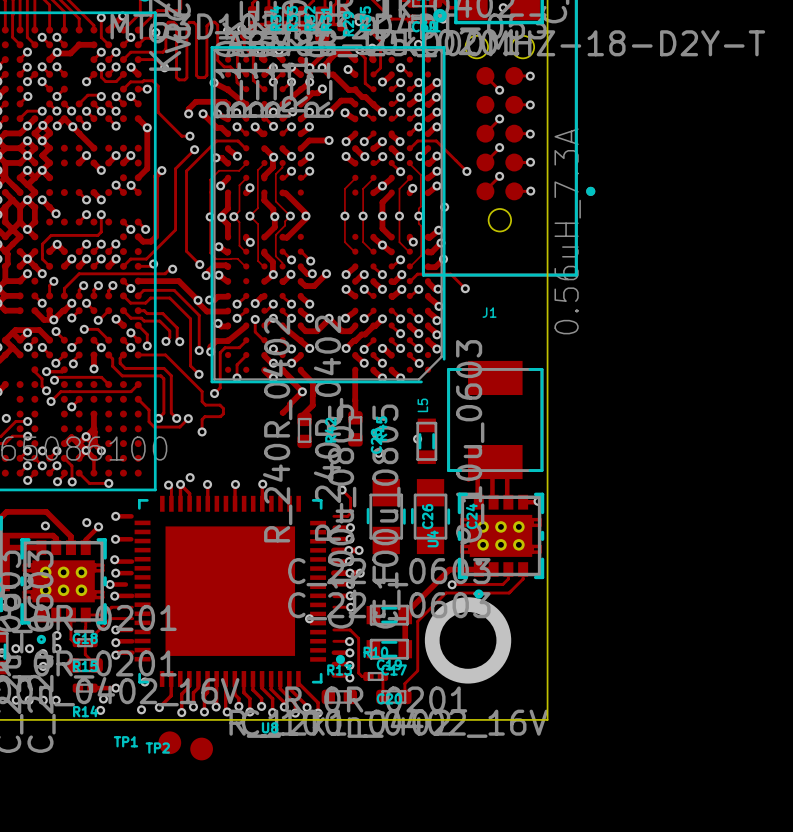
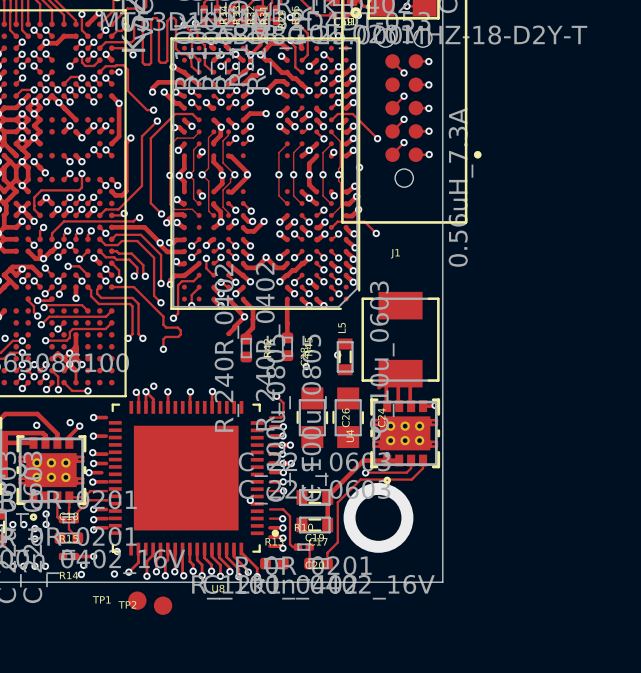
track: (138, 399) (149, 410) (149, 421) (154, 427) (179, 427) (188, 418) -> (111, 322) (105, 329) (72, 329) (66, 340) (45, 340)
via position: (188, 418) -> (45, 340)

